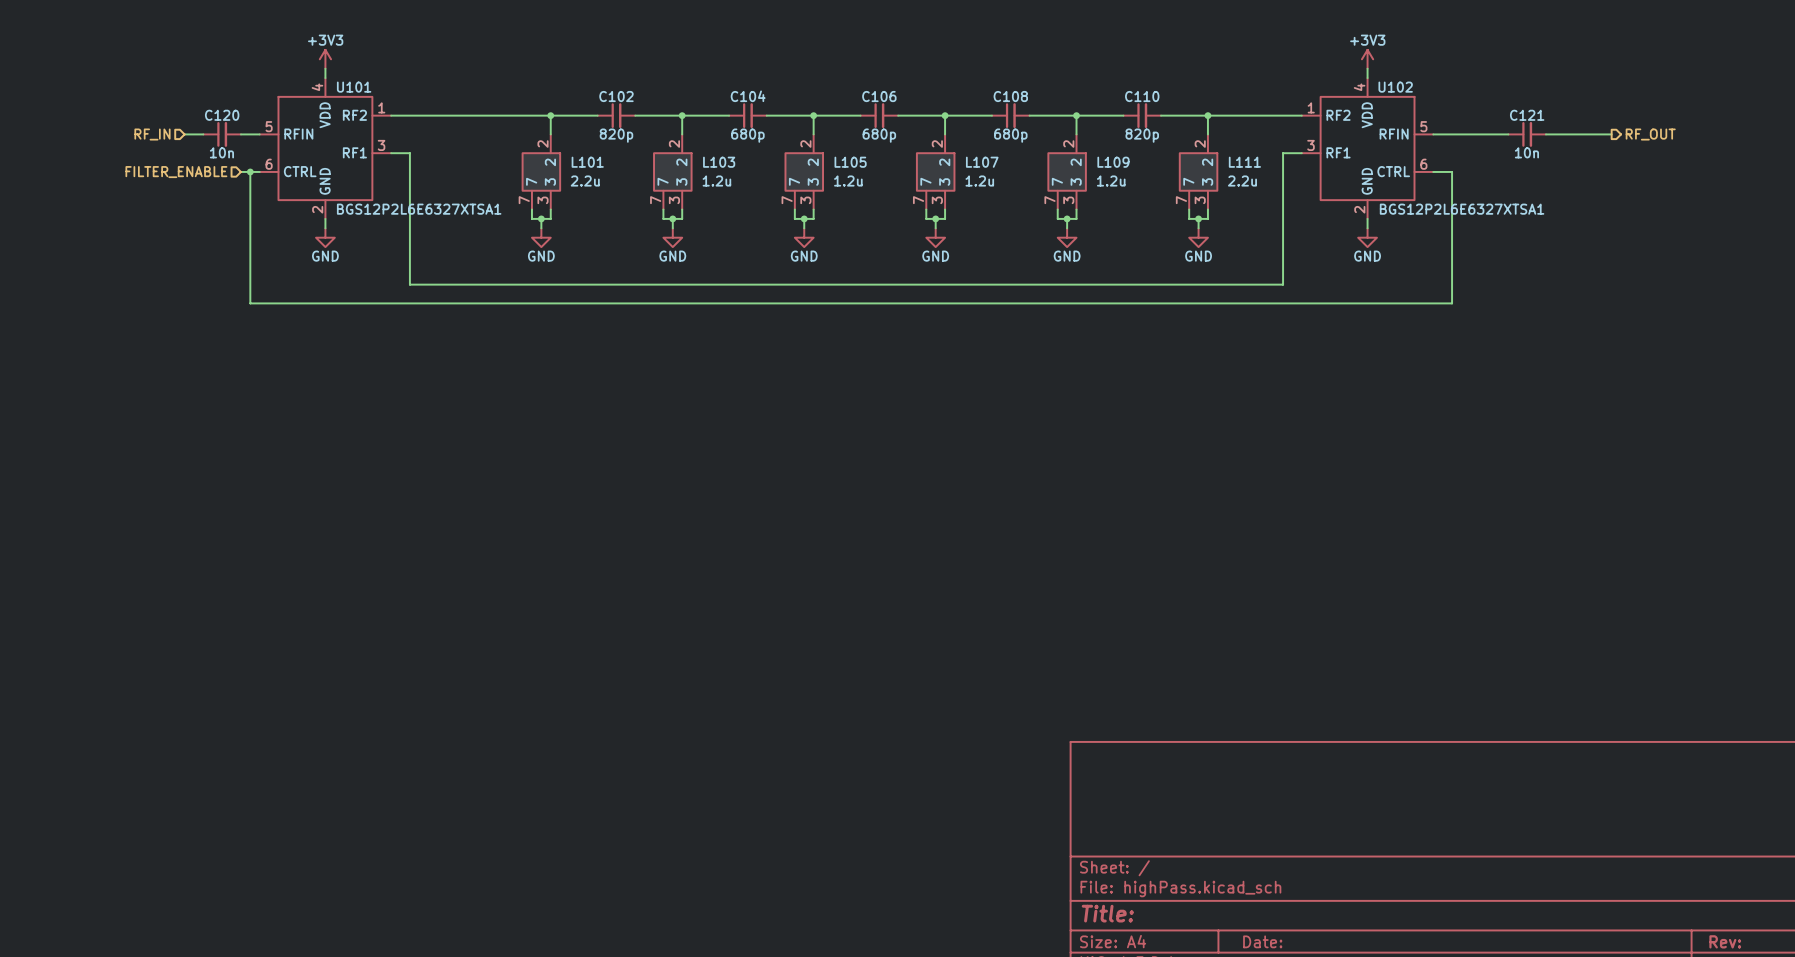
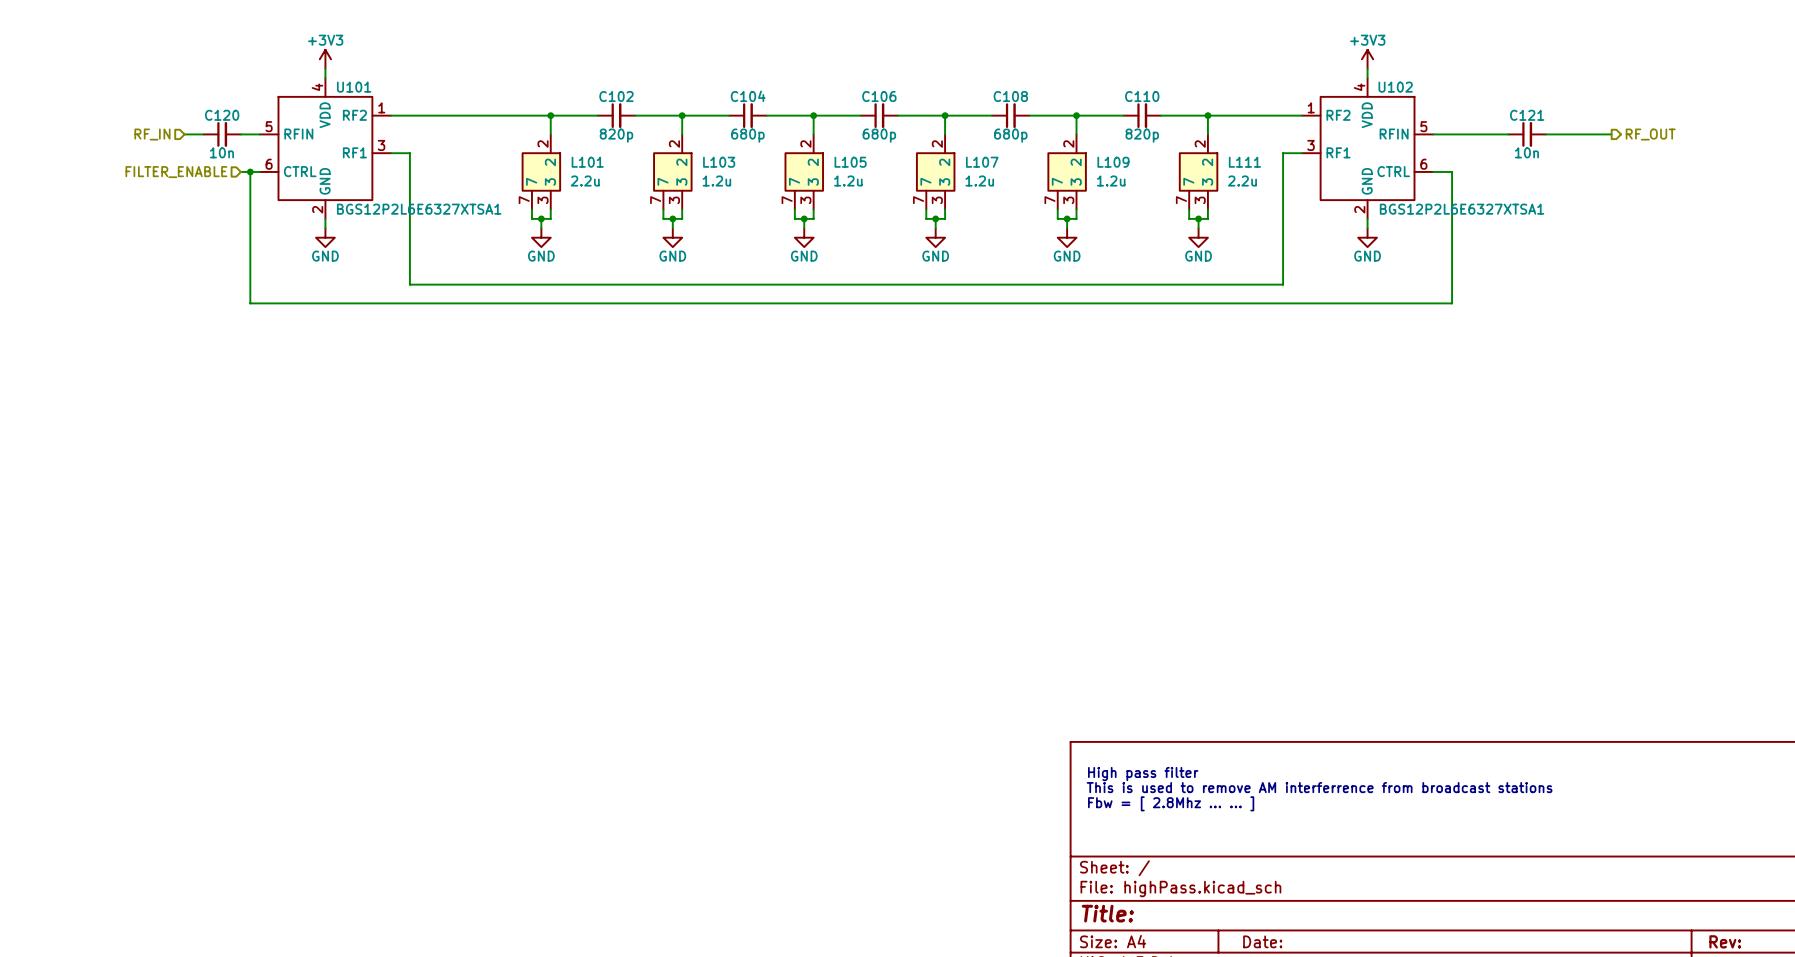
text: none -> High pass filter (1143, 774)
text: none -> This is used to remove AM interferrence from broadcast stations (1319, 787)
text: none -> Fbw = [ 2.8Mhz ... ... ] (1171, 803)

